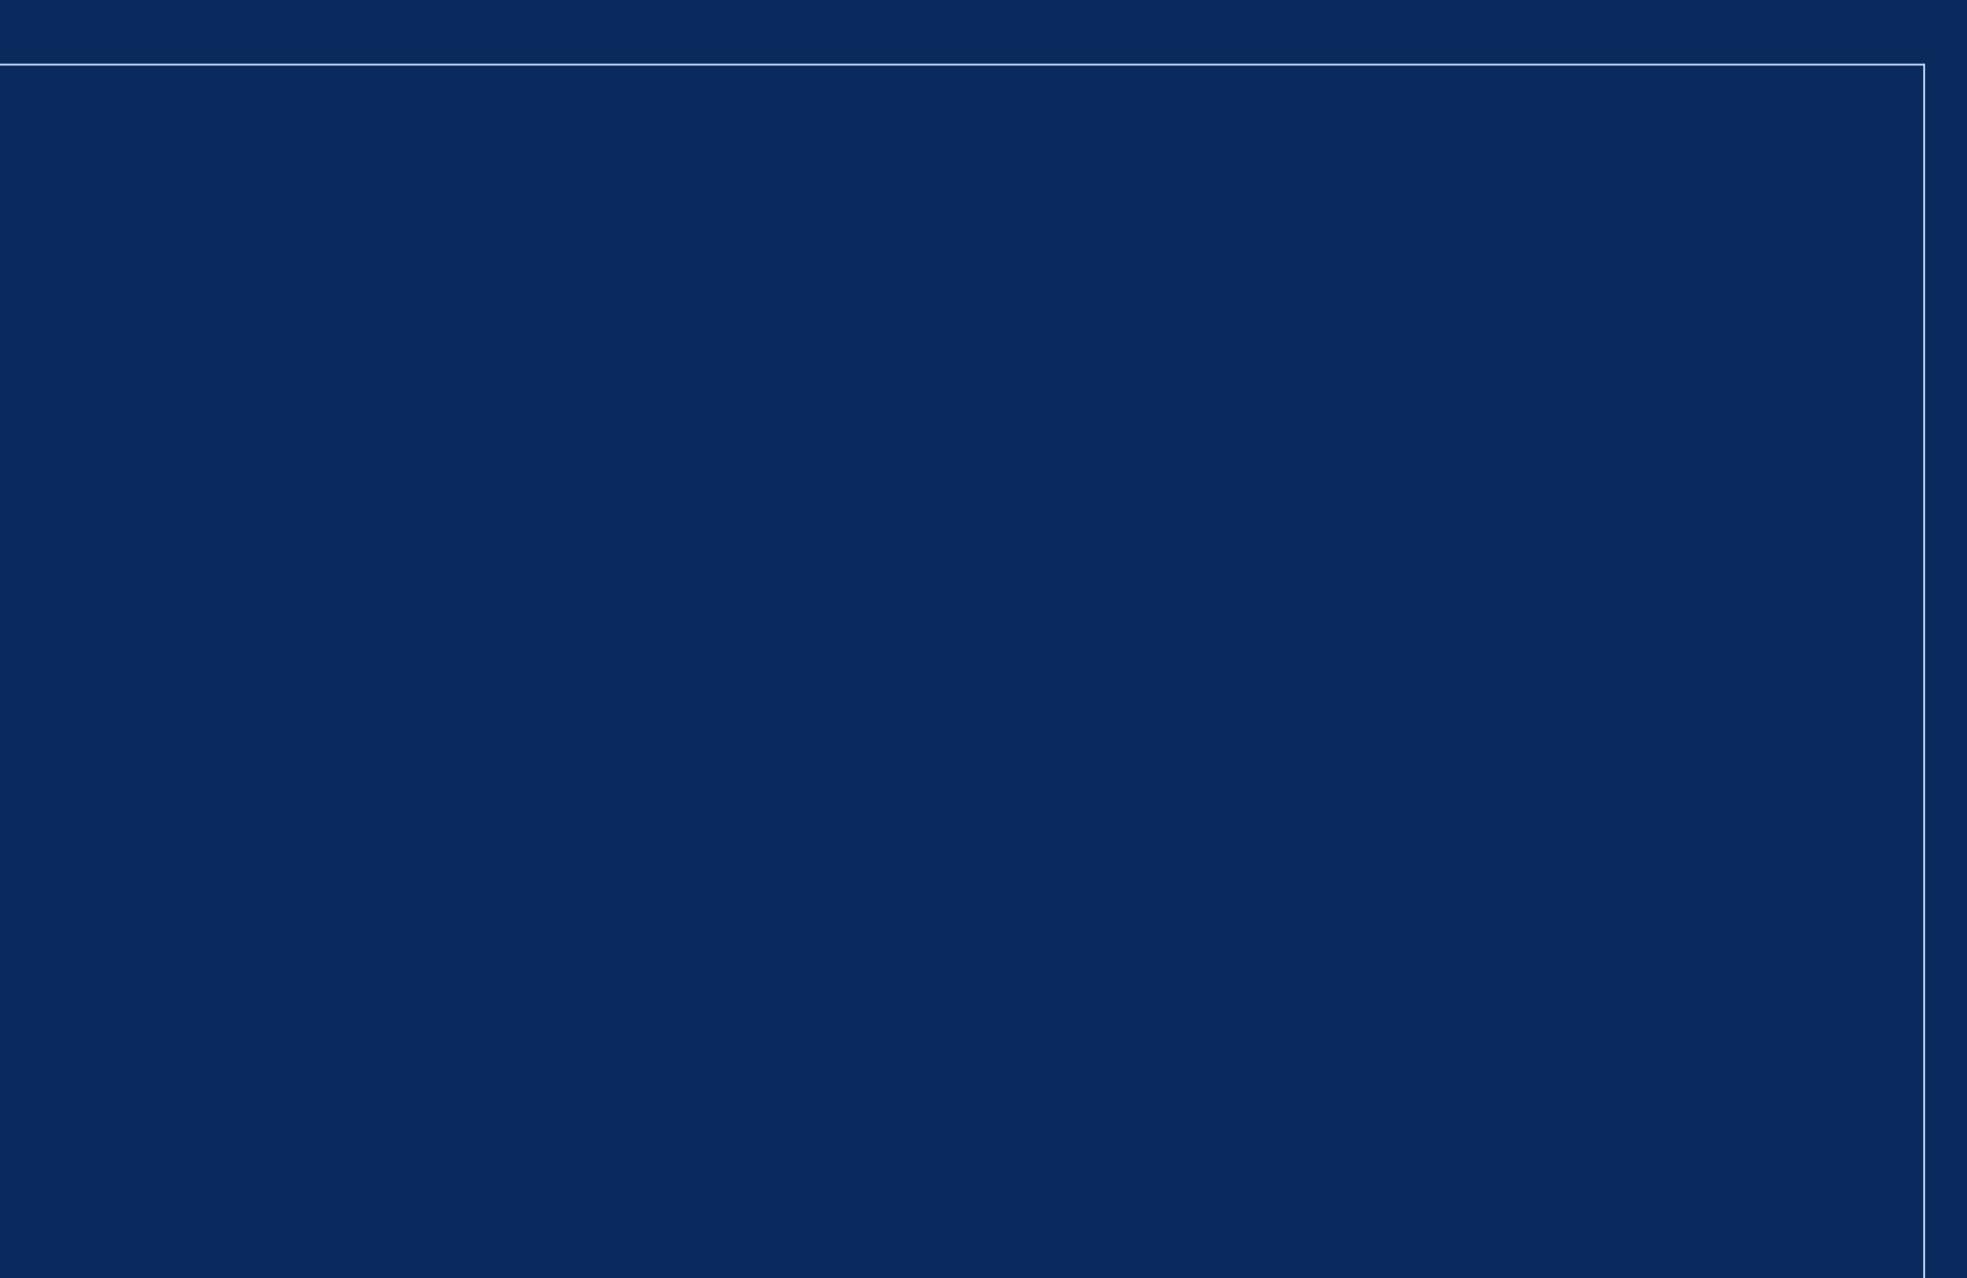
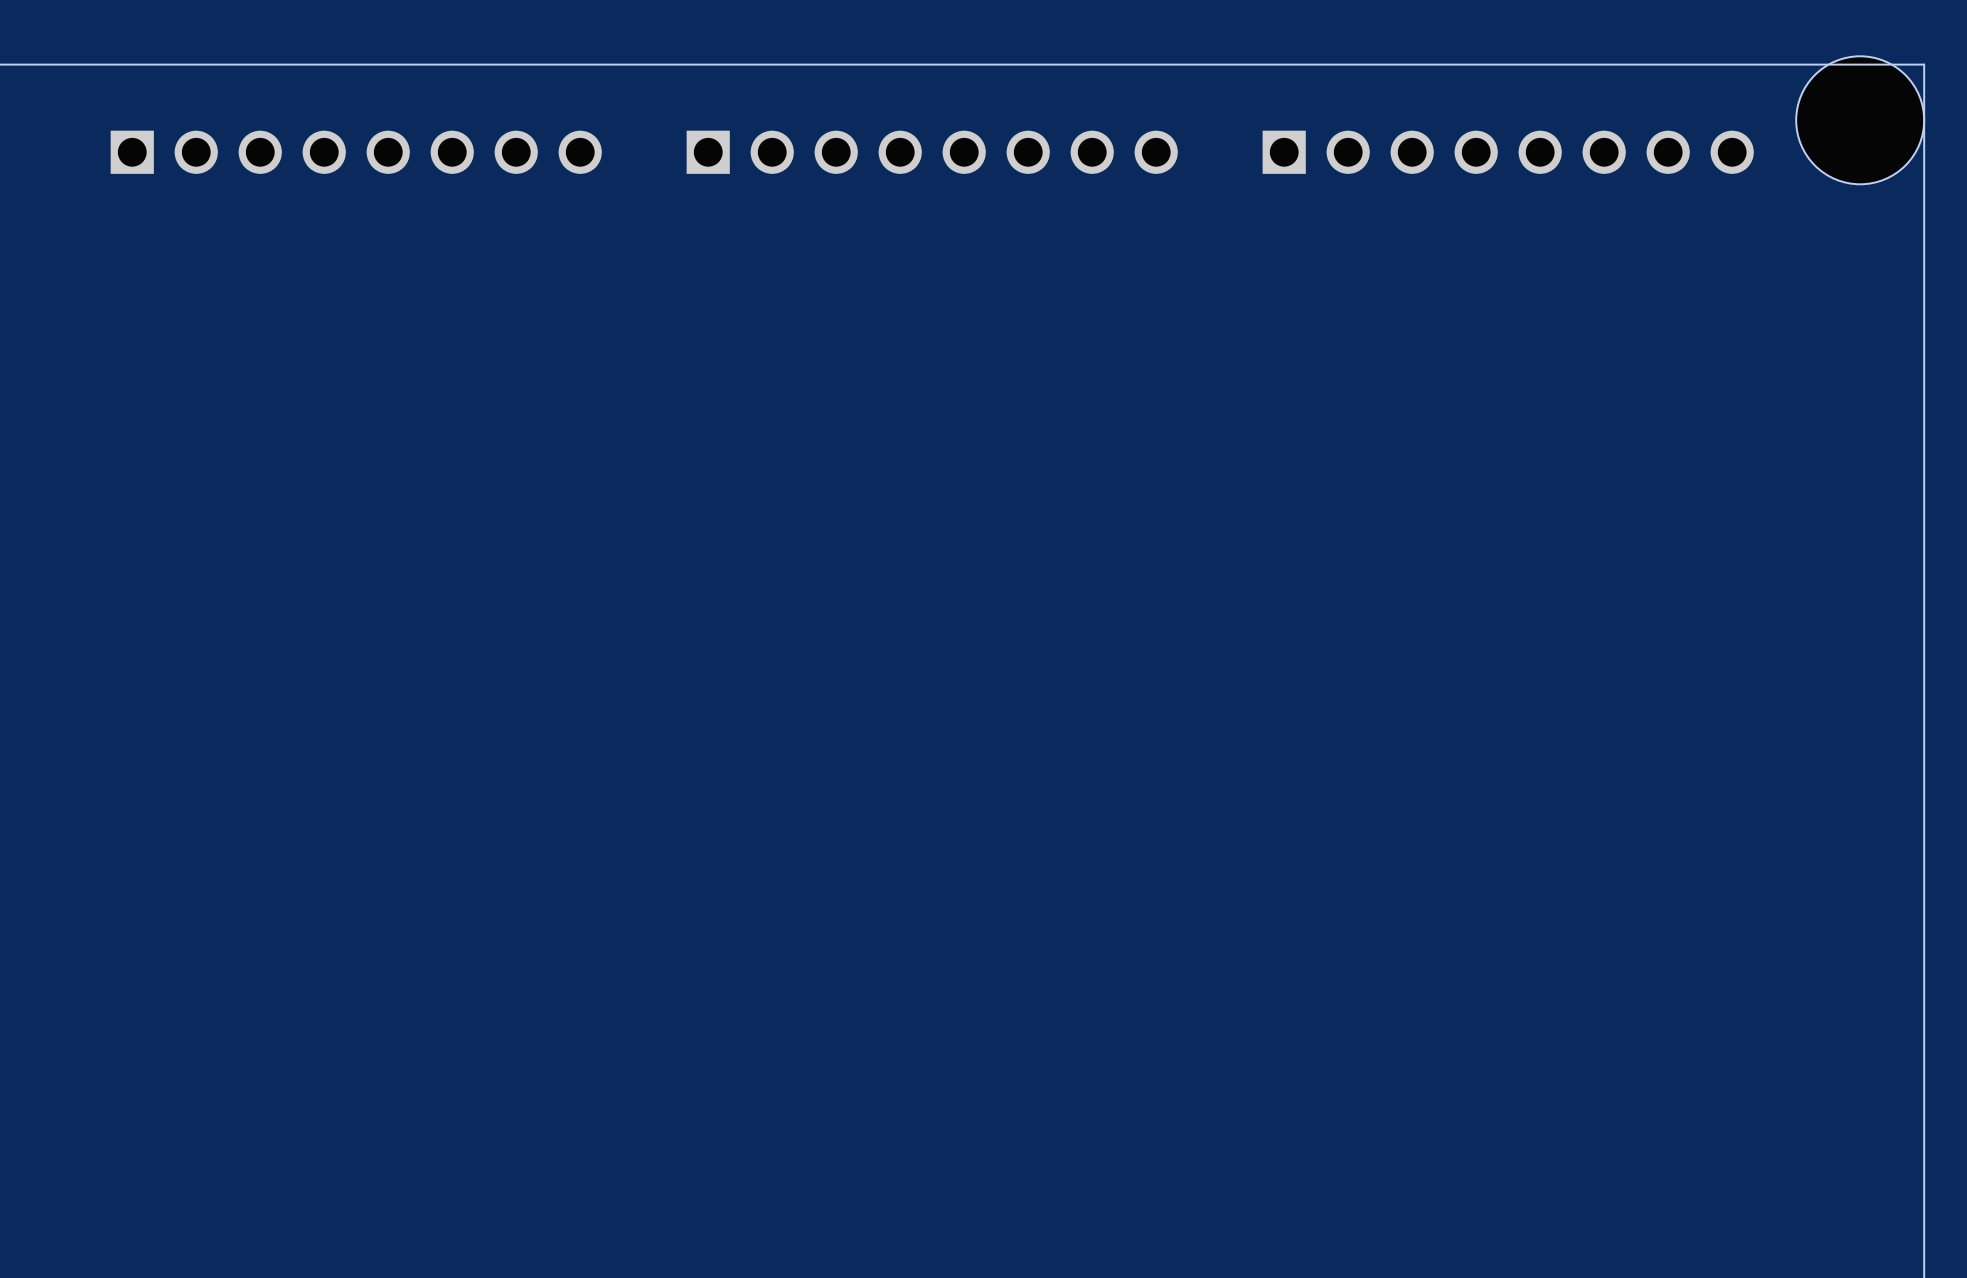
hole: none -> (1860, 120)
part: none -> (356, 152)
part: none -> (932, 152)
part: none -> (1508, 152)

